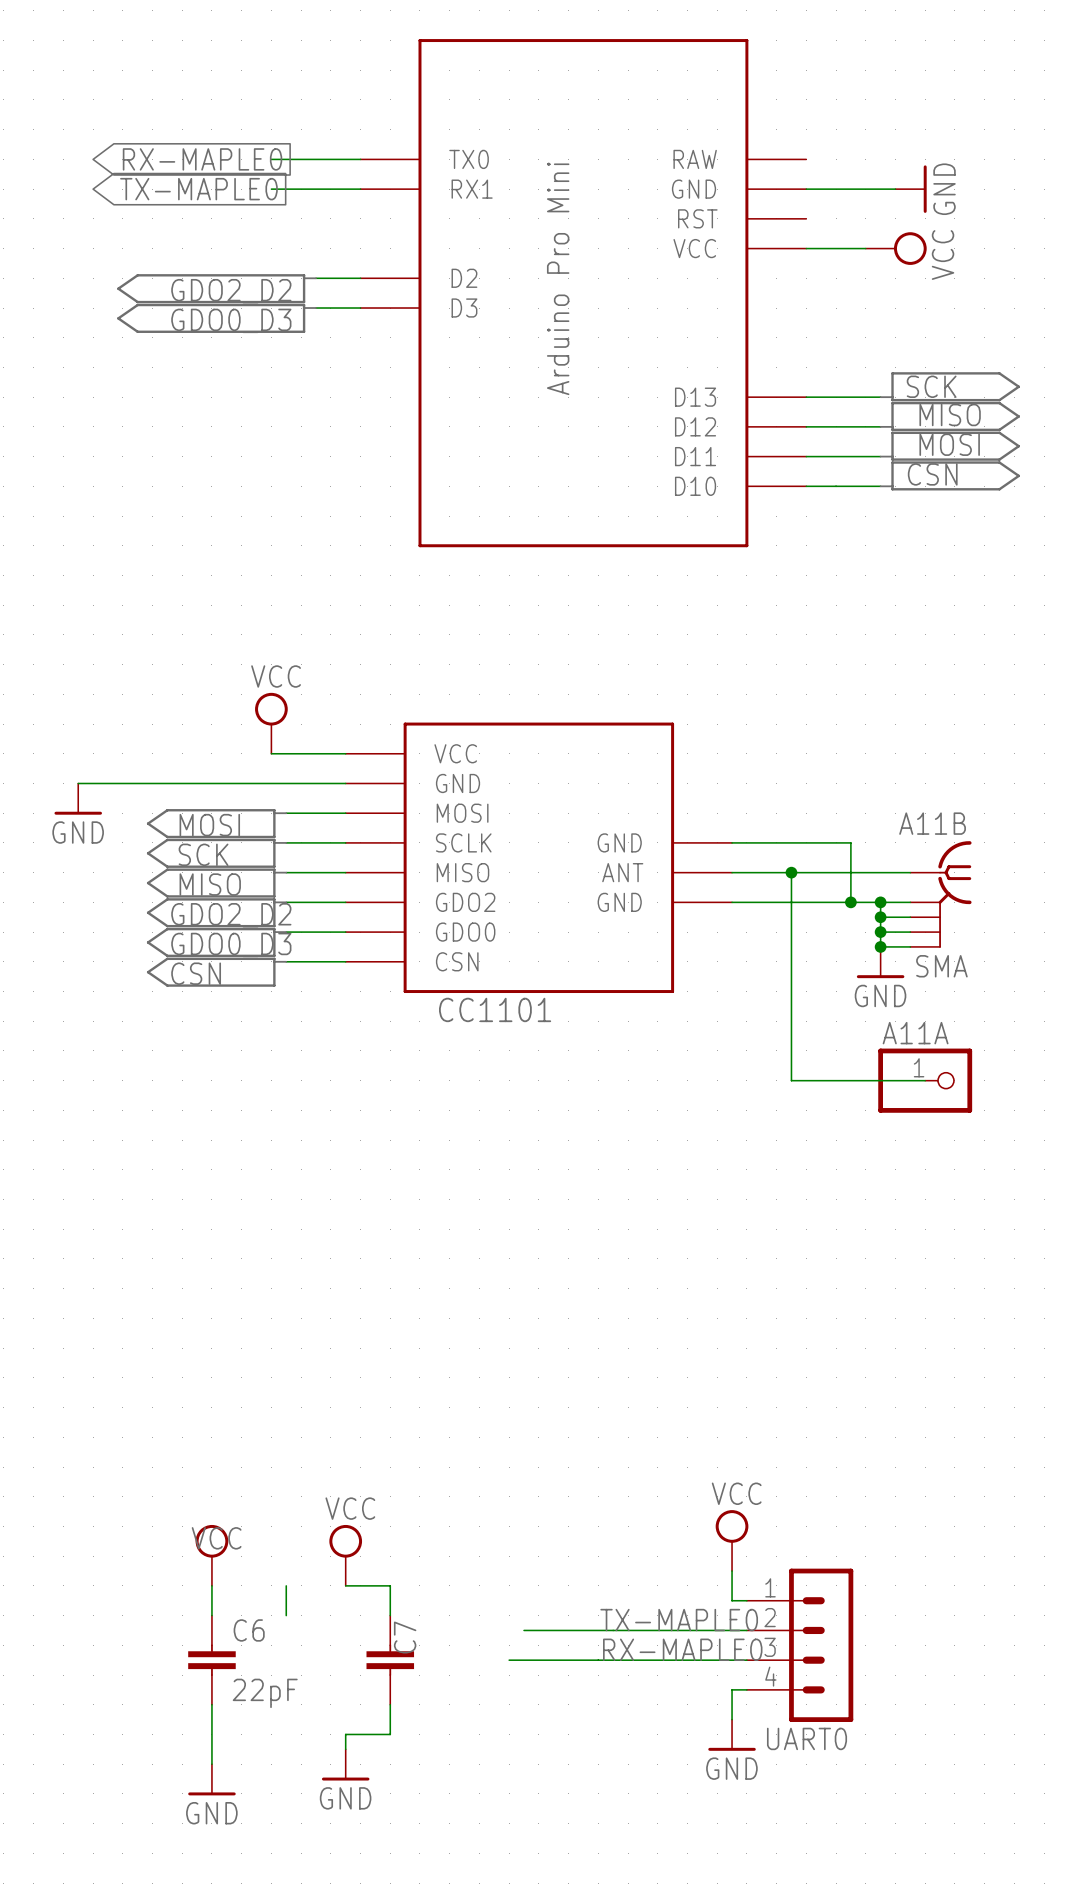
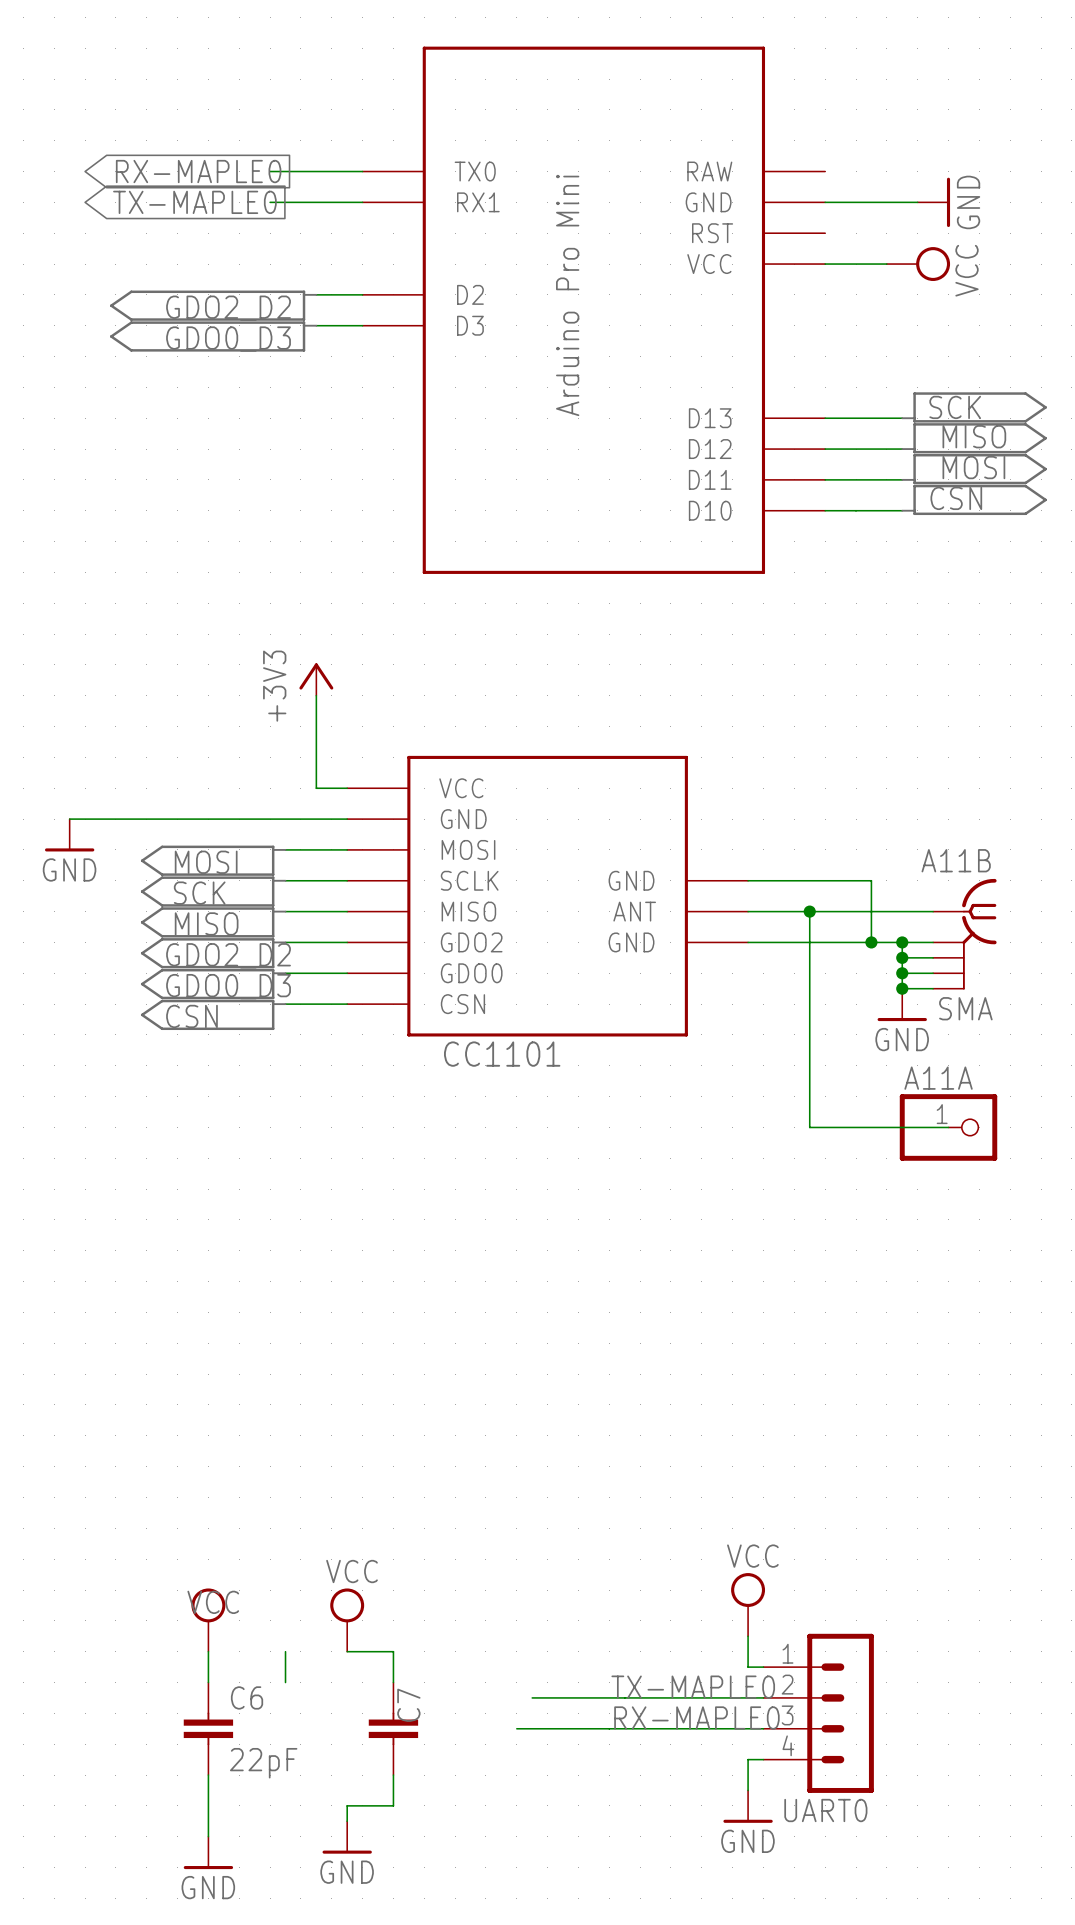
power symbol: none -> +3V3 (316, 679)
power symbol: VCC (271, 723) -> none
wire: (271, 753) (315, 753) -> (316, 695) (316, 788)

